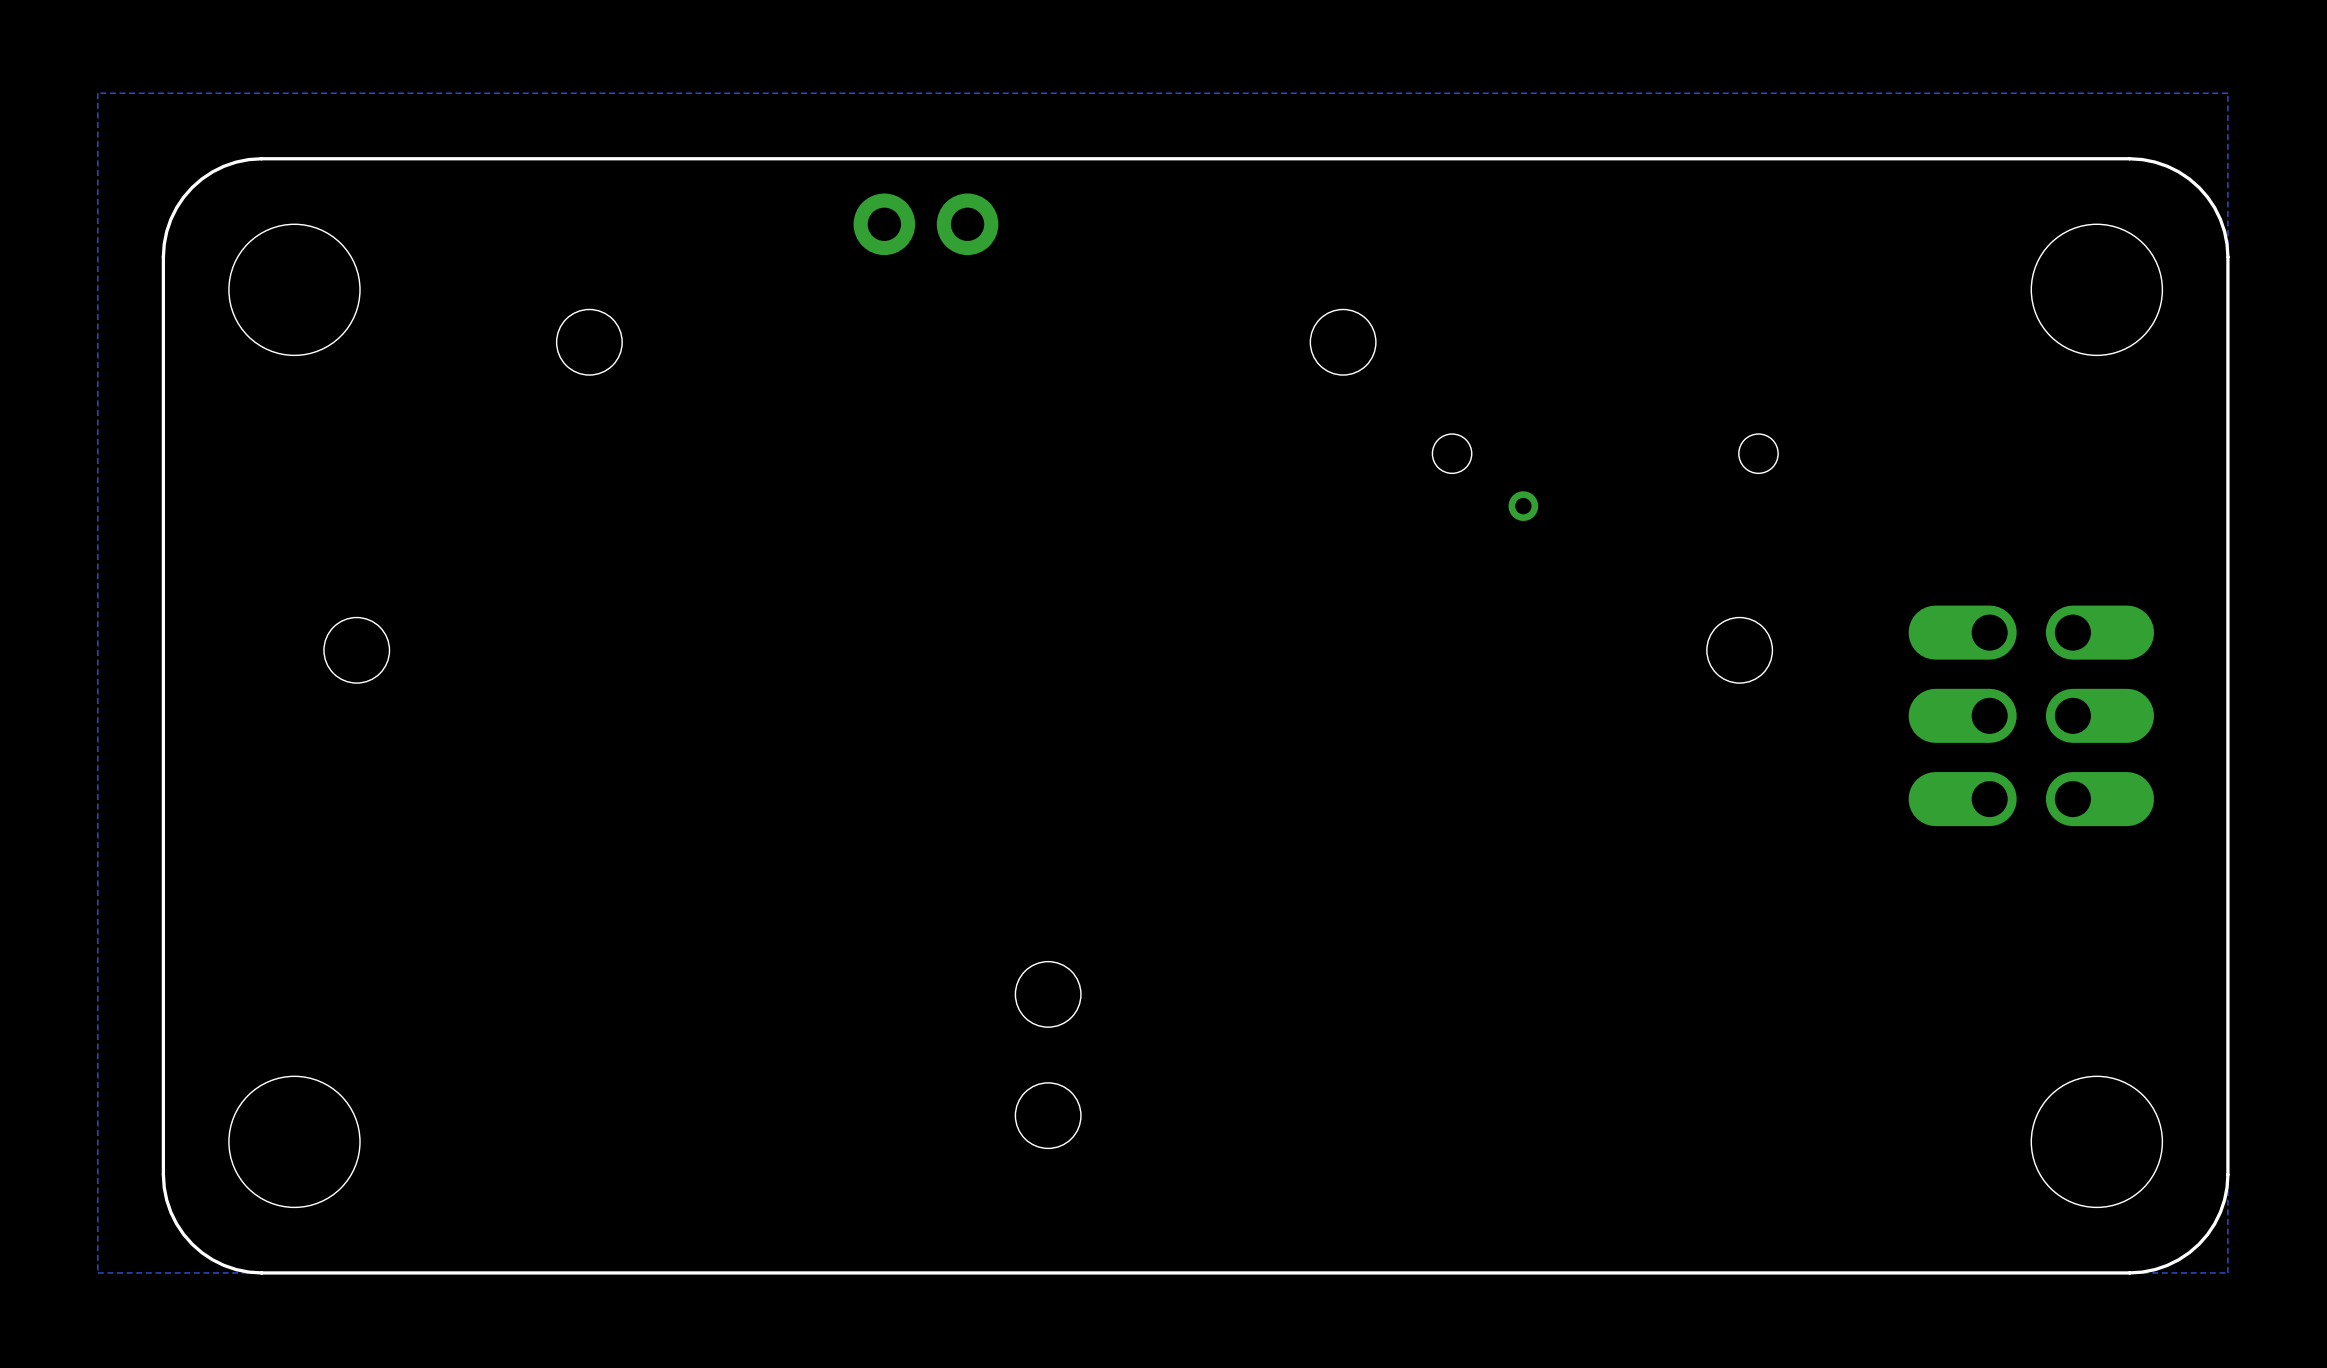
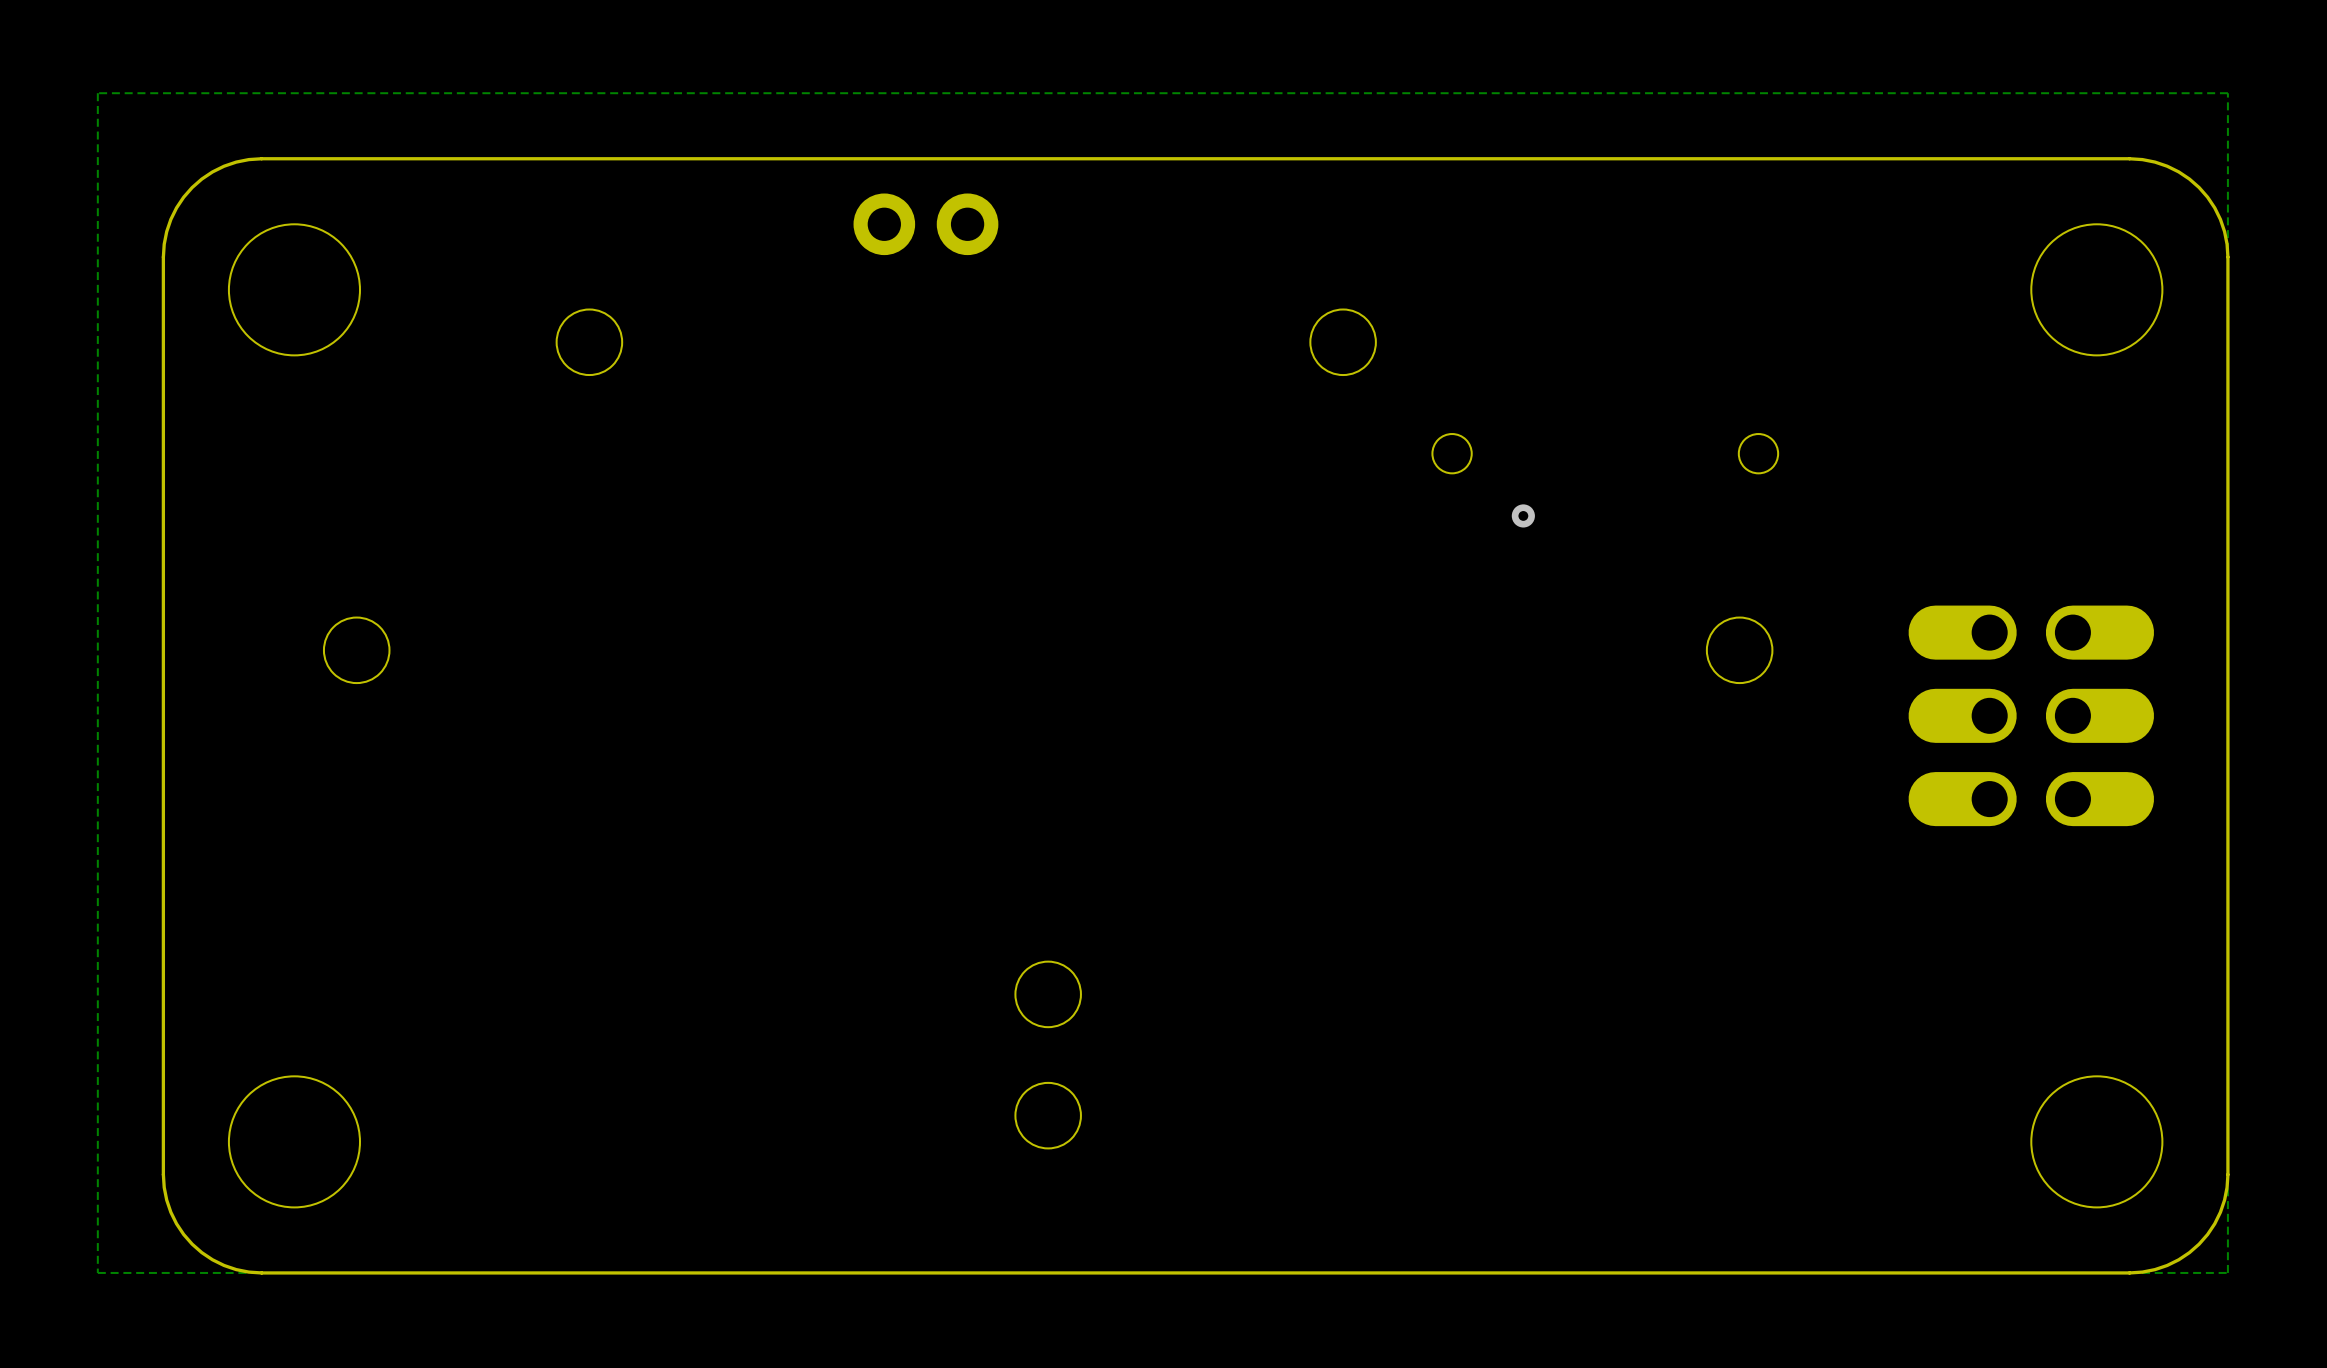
via size: [1508, 491, 1539, 521] -> [1511, 504, 1535, 528]

